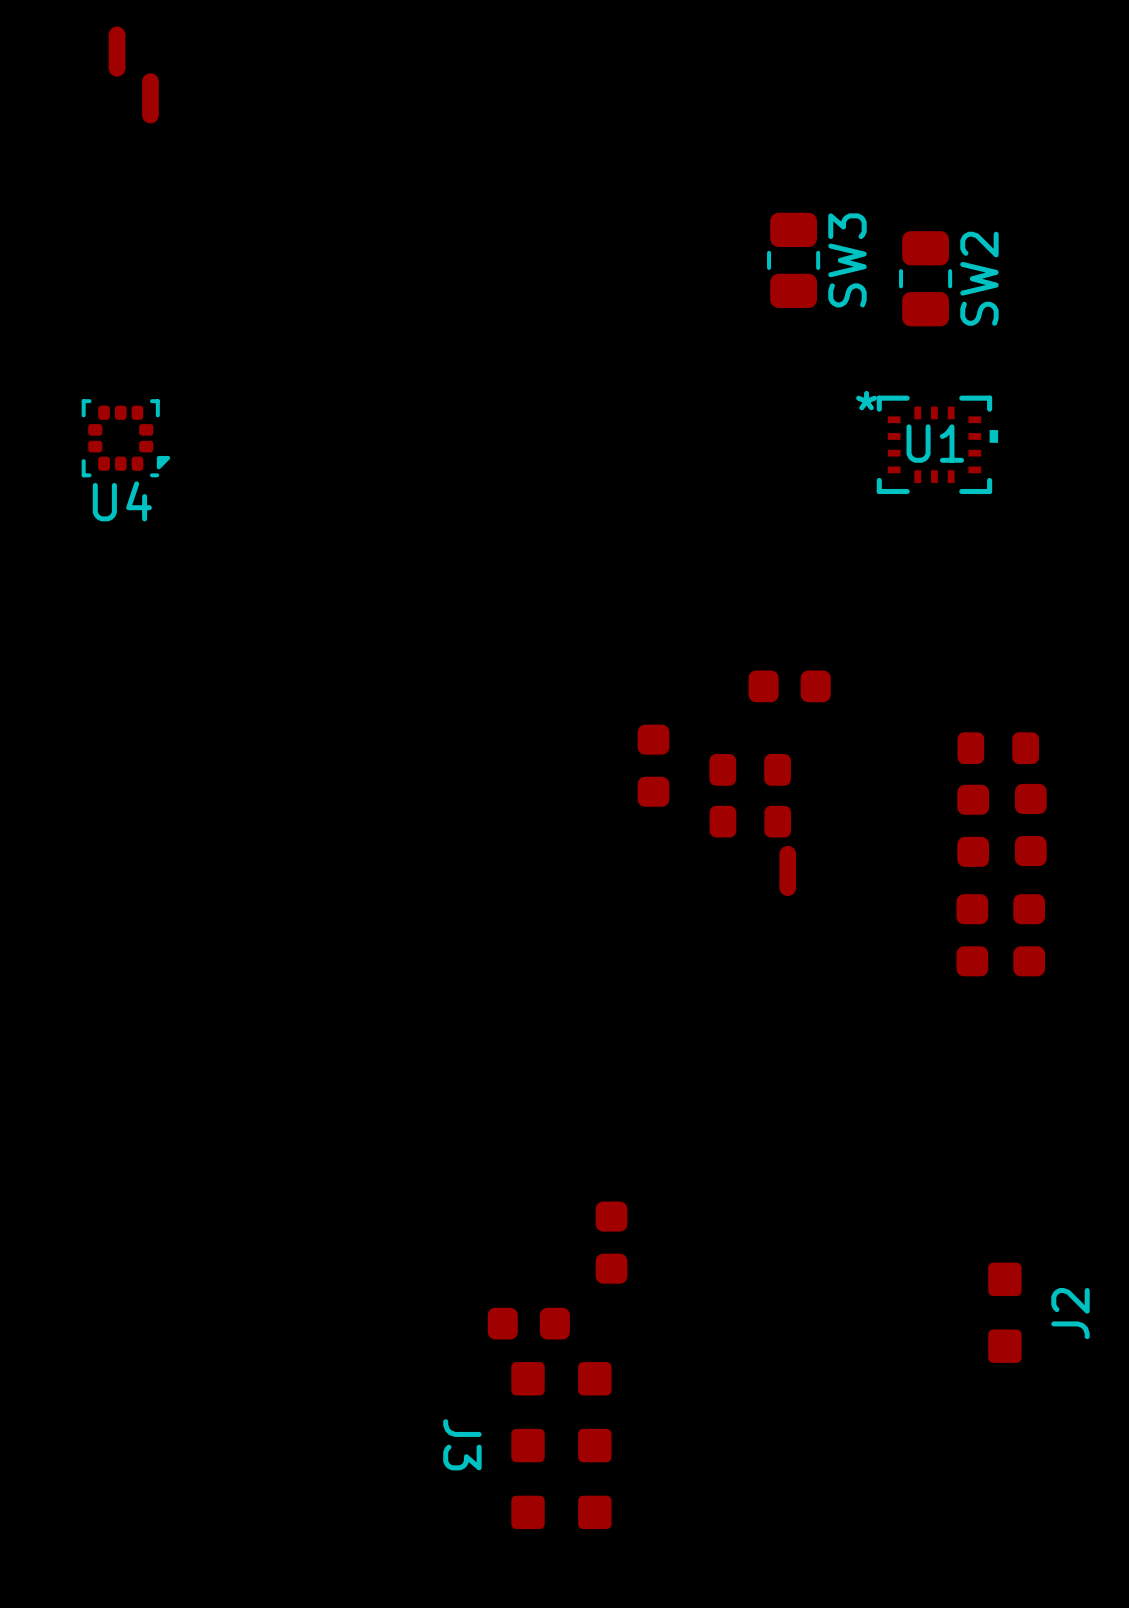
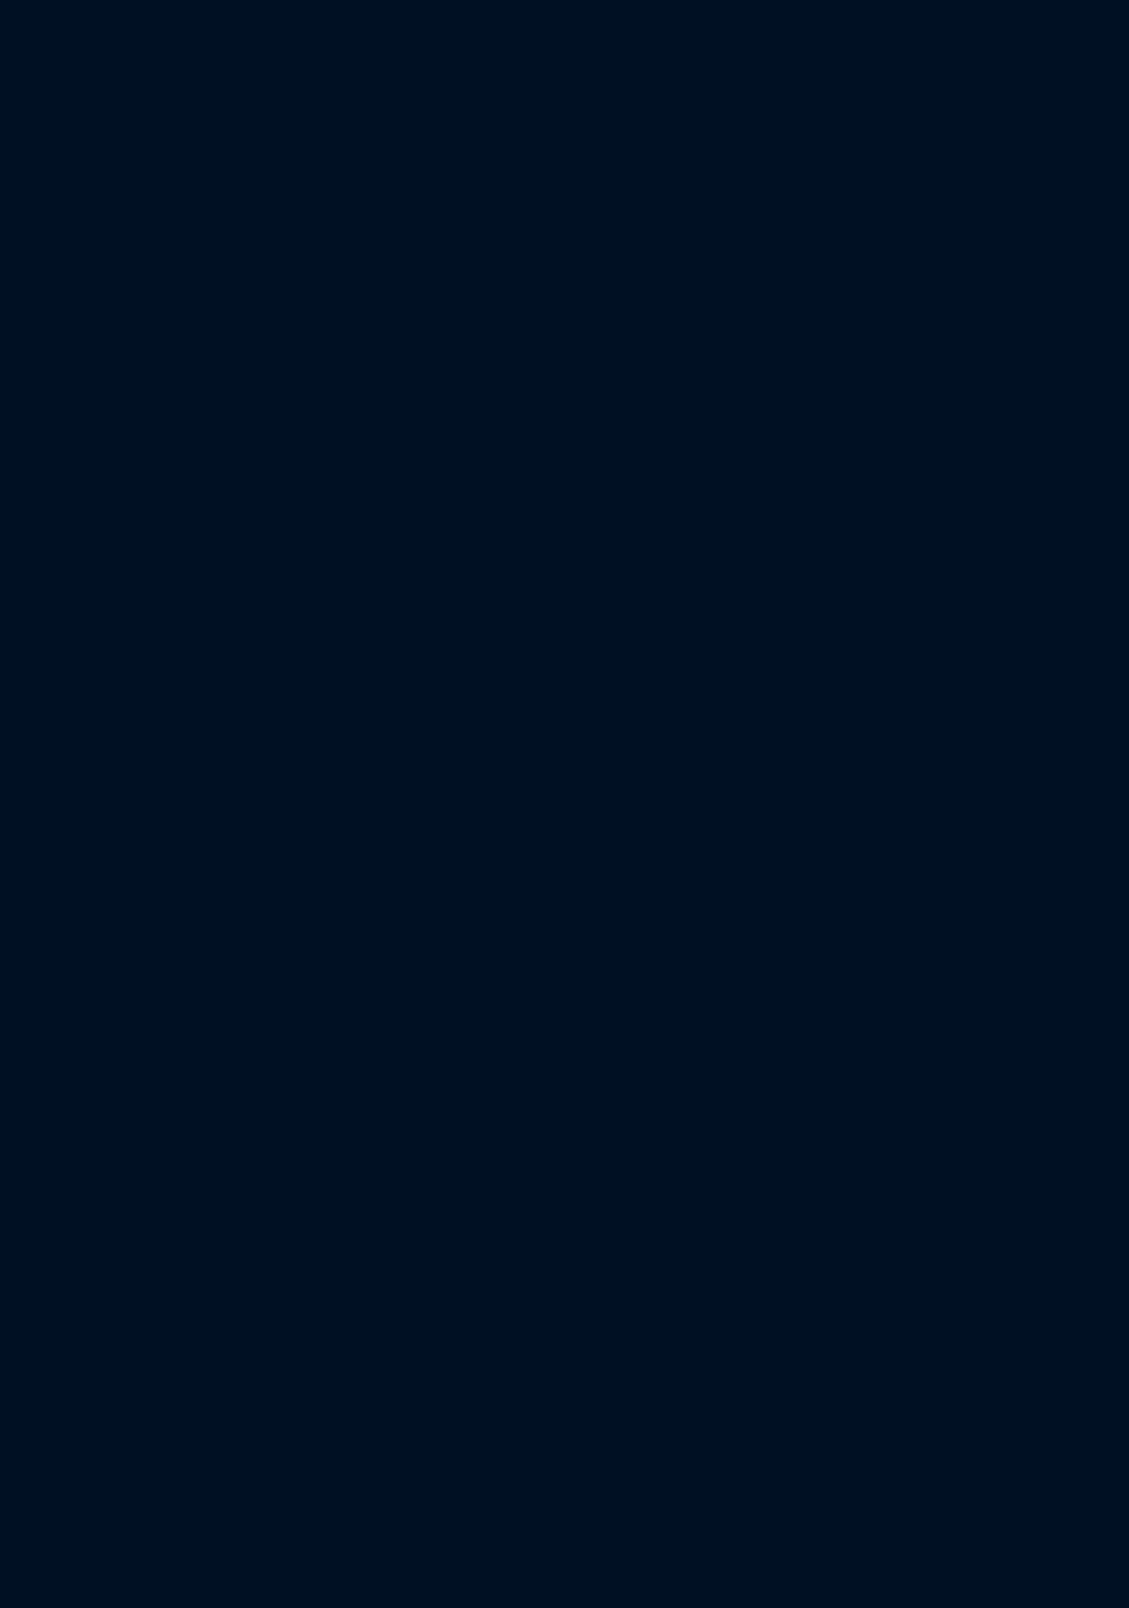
part: (117, 51) -> none
part: (150, 98) -> none
SW3: (793, 260) -> none
SW2: (925, 278) -> none
U4: (125, 438) -> none
U1: (937, 444) -> none
part: (789, 686) -> none
part: (998, 748) -> none
part: (653, 765) -> none
part: (750, 769) -> none
part: (750, 821) -> none
part: (973, 825) -> none
part: (1030, 825) -> none
part: (787, 870) -> none
part: (972, 935) -> none
part: (1029, 935) -> none
part: (611, 1242) -> none
J2: (1004, 1312) -> none
part: (528, 1323) -> none
J3: (561, 1445) -> none

